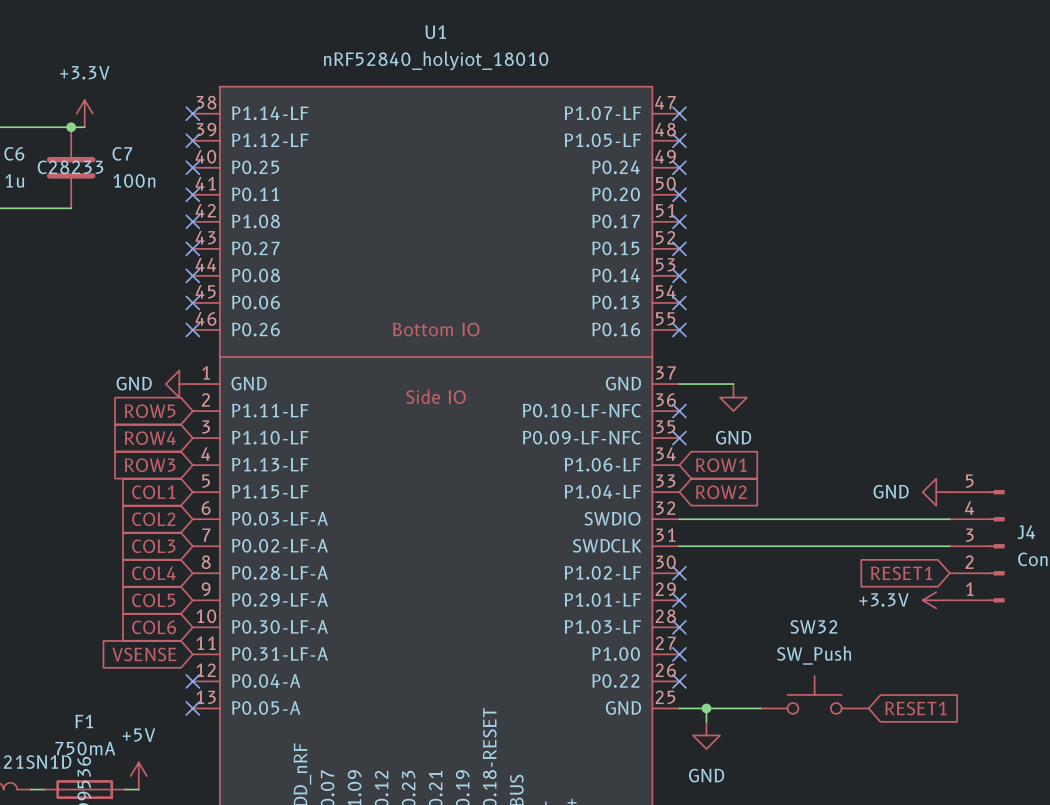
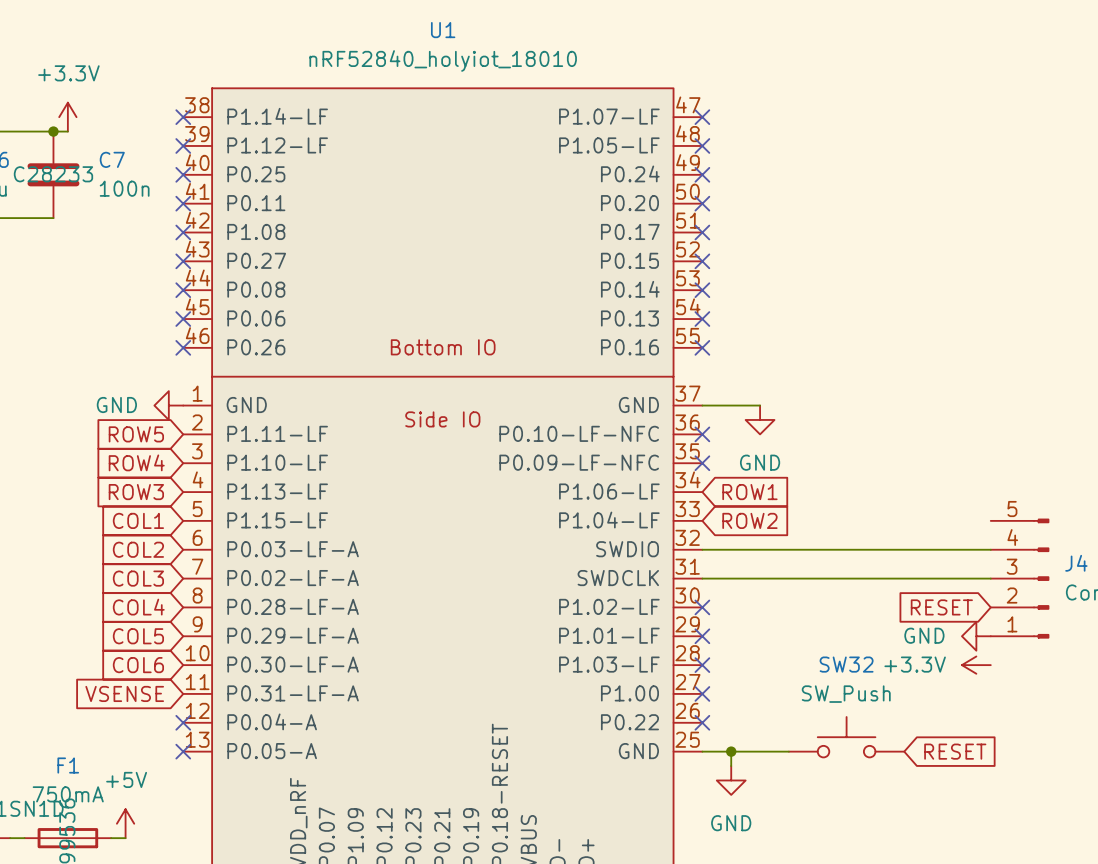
power symbol: GND (936, 492) -> none
global label: RESET1 (901, 573) -> RESET (941, 607)
power symbol: +3.3V (936, 600) -> GND (976, 636)
power symbol: none -> +3.3V (976, 665)
global label: RESET1 (915, 708) -> RESET (955, 751)

